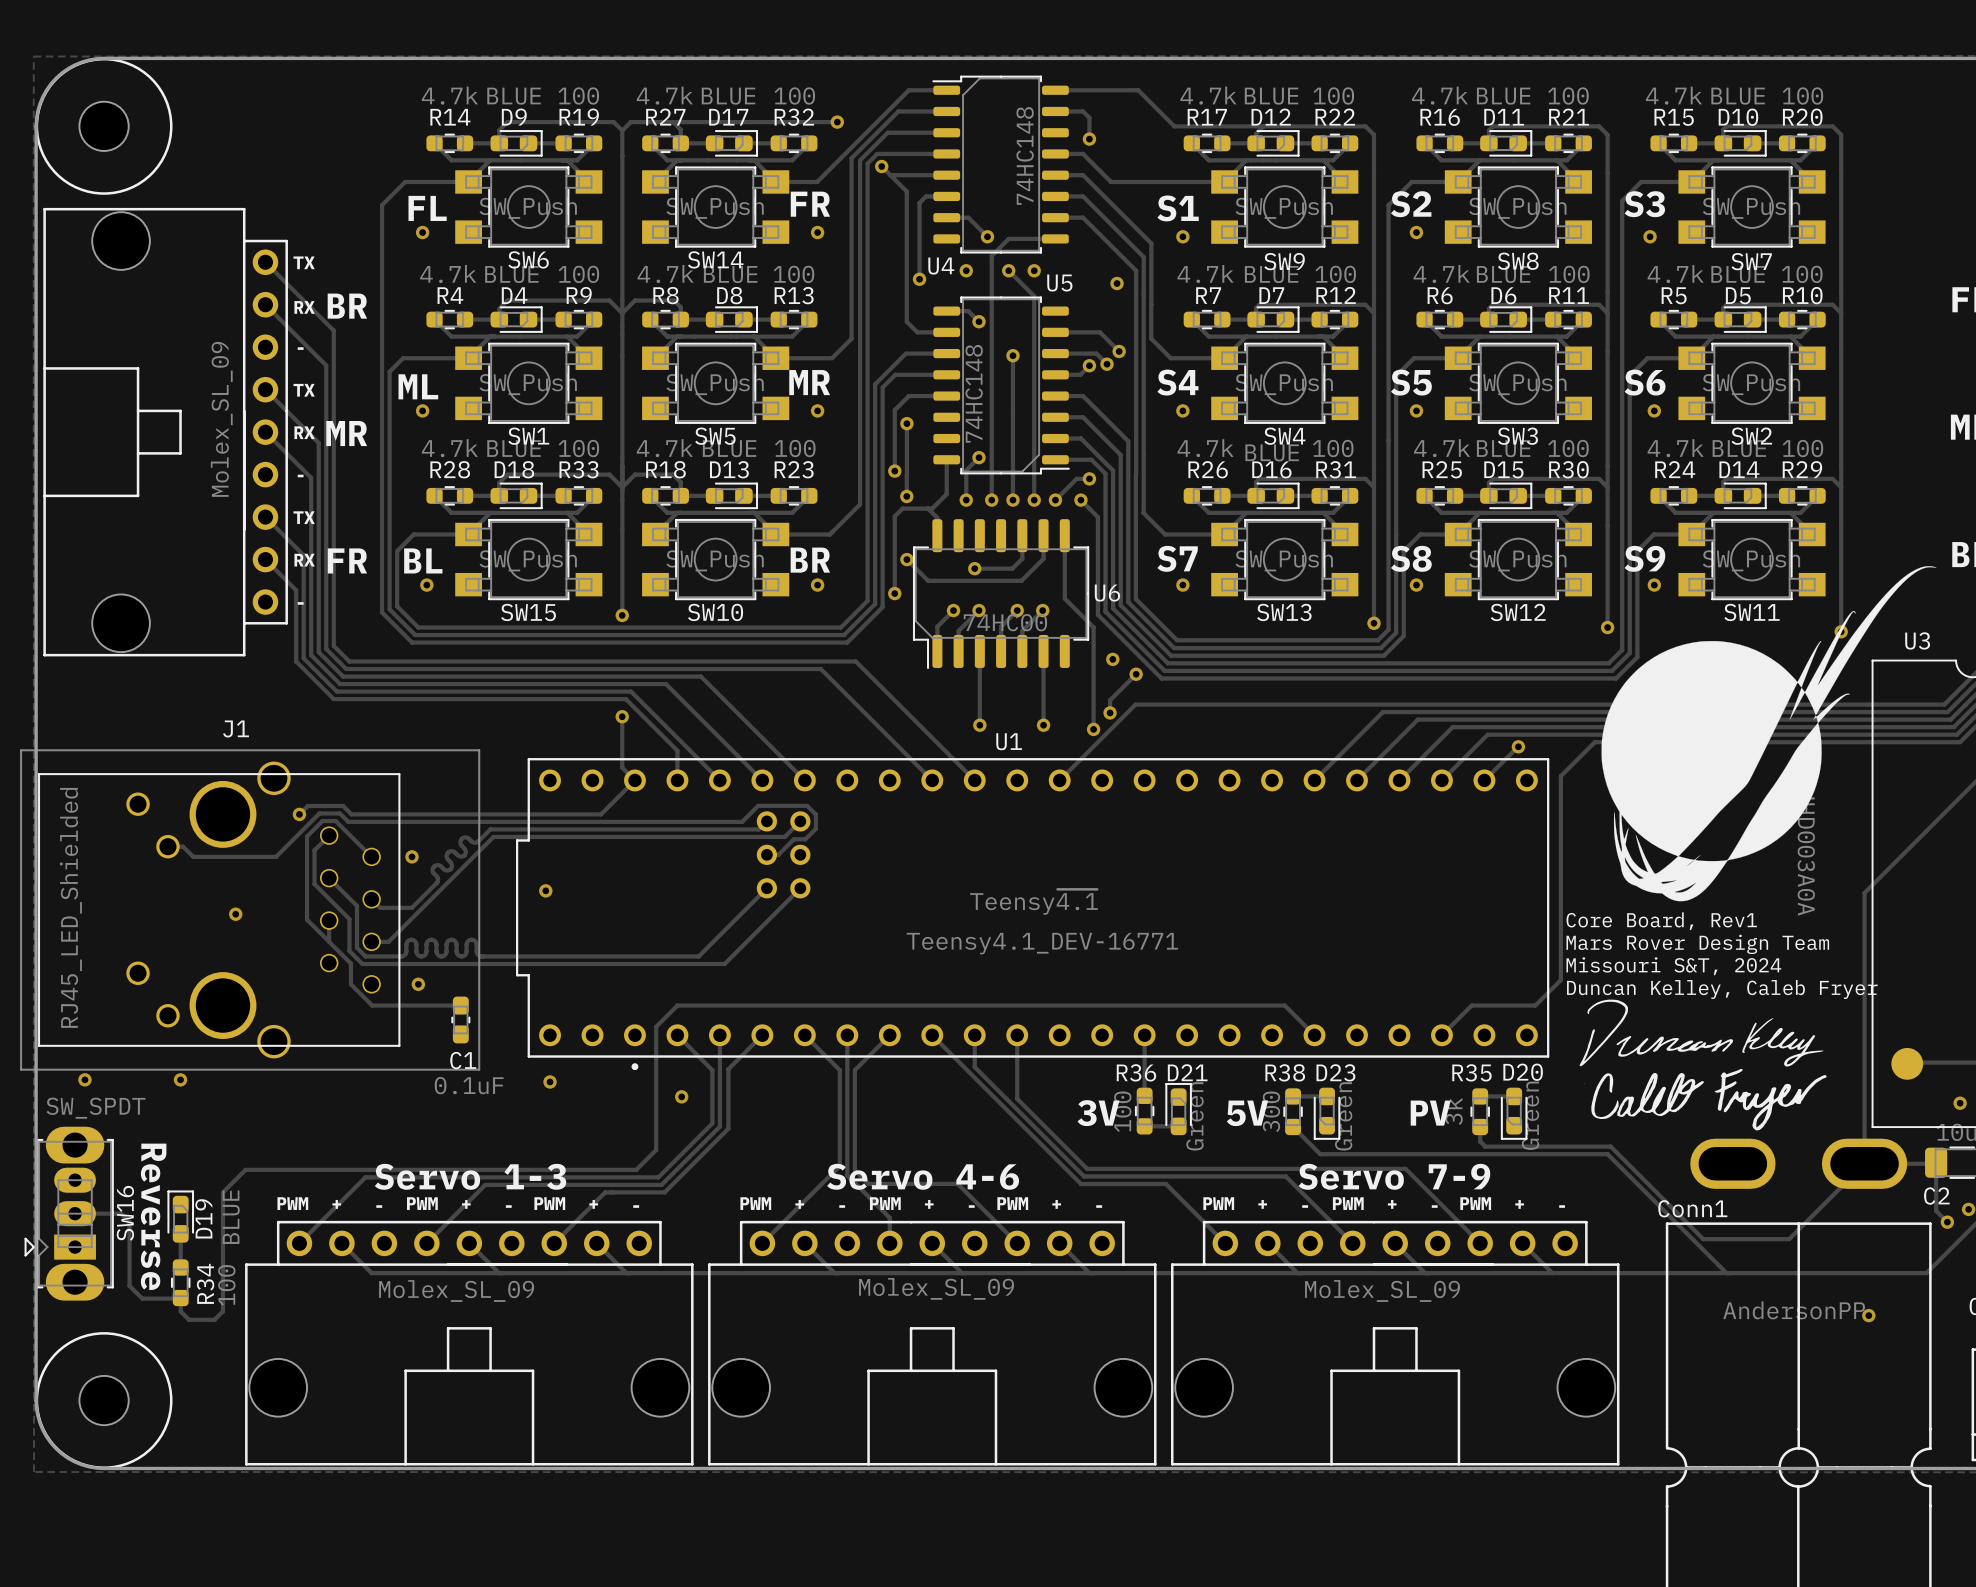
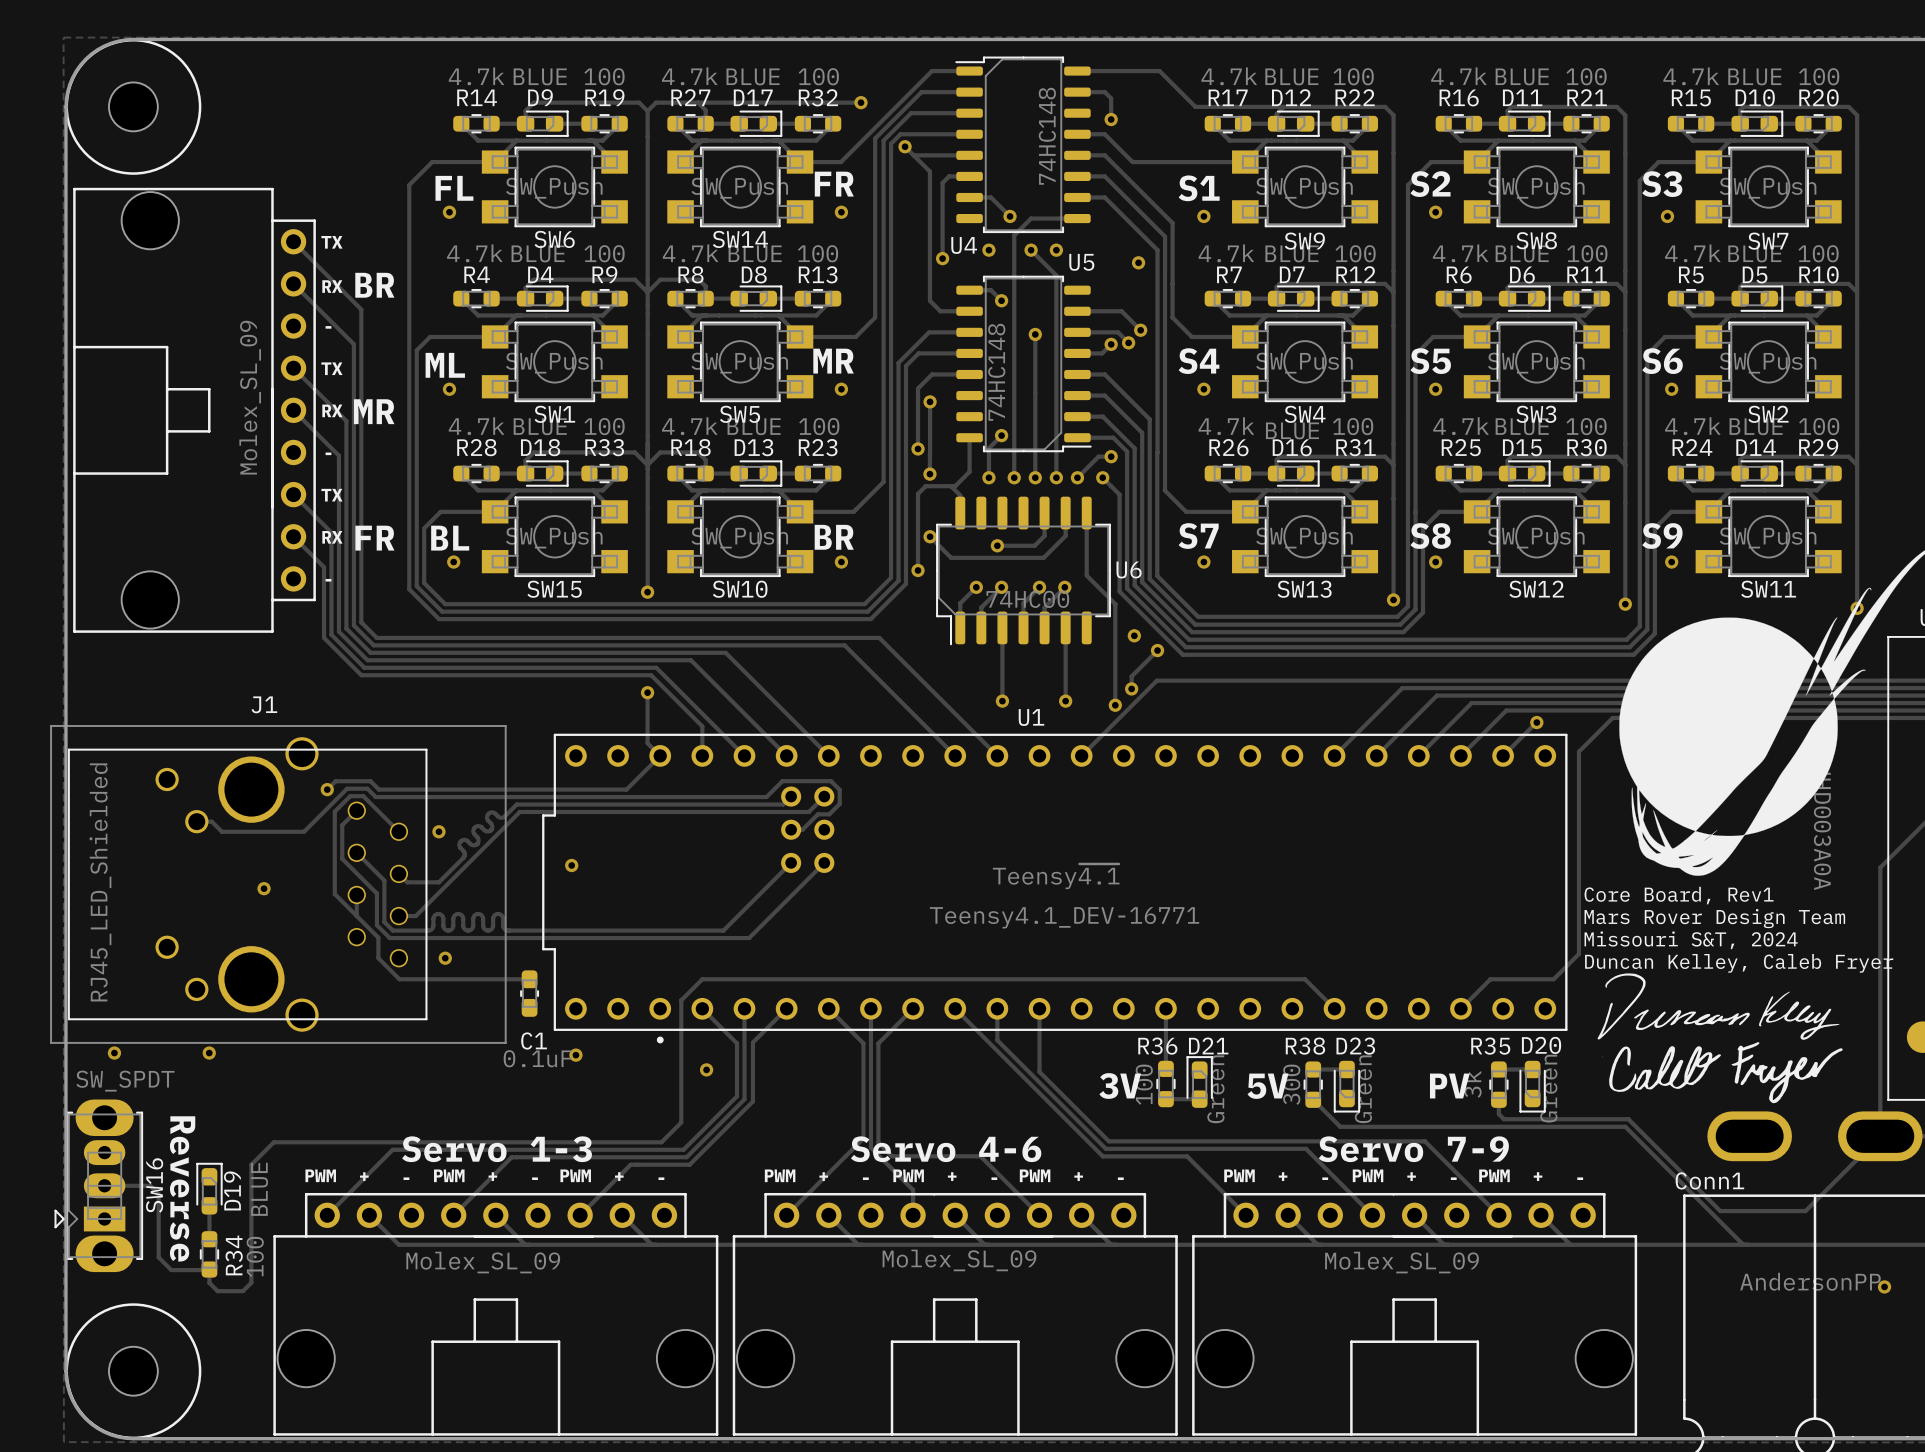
track: none -> (487, 979) (529, 979)
C1 position: (460, 1019) -> (529, 993)
C1 name position: C1 (463, 1060) -> C1 (534, 1041)

